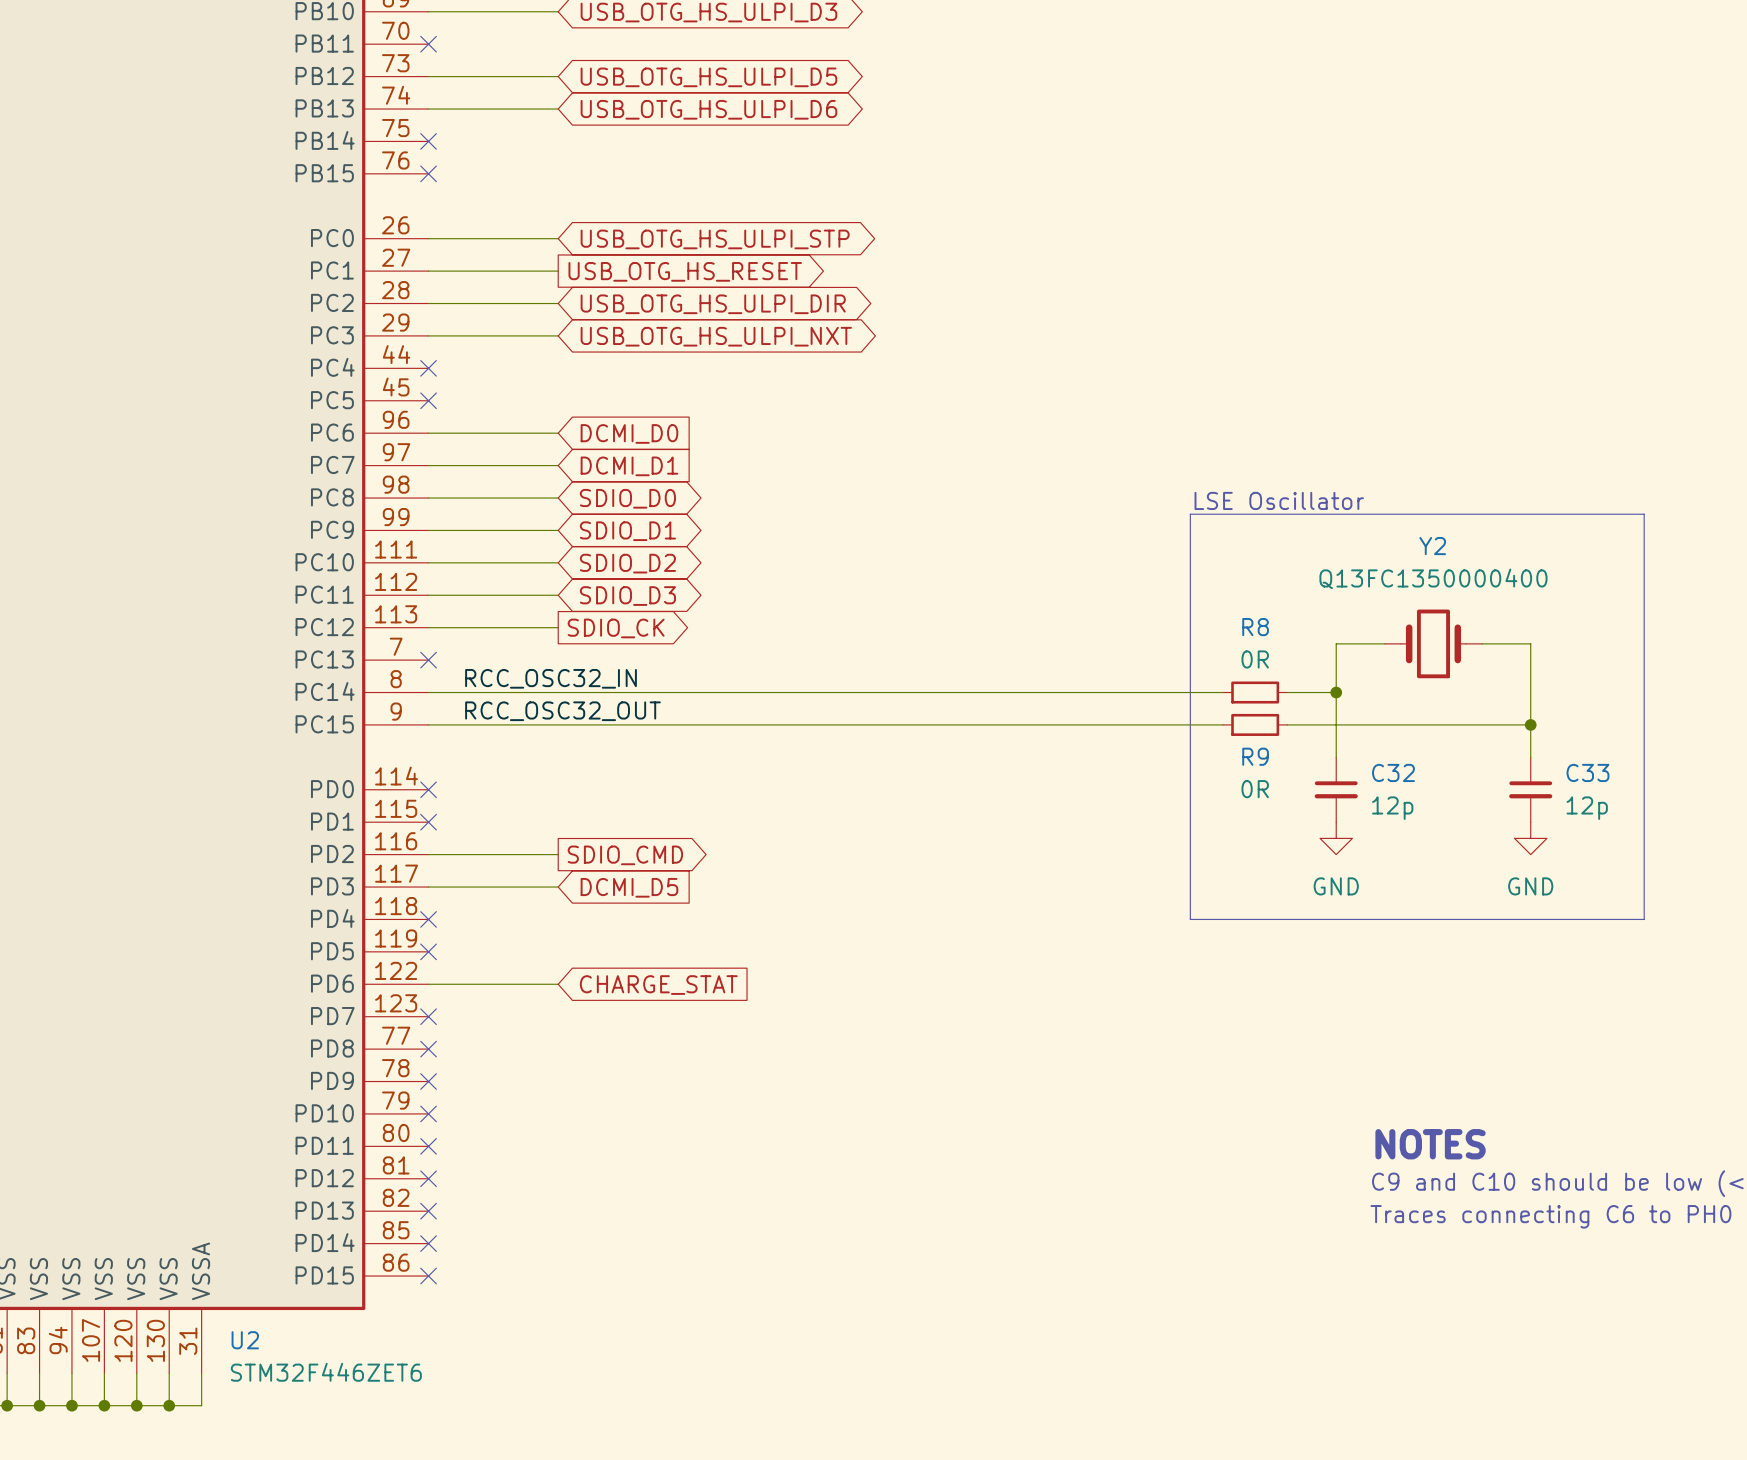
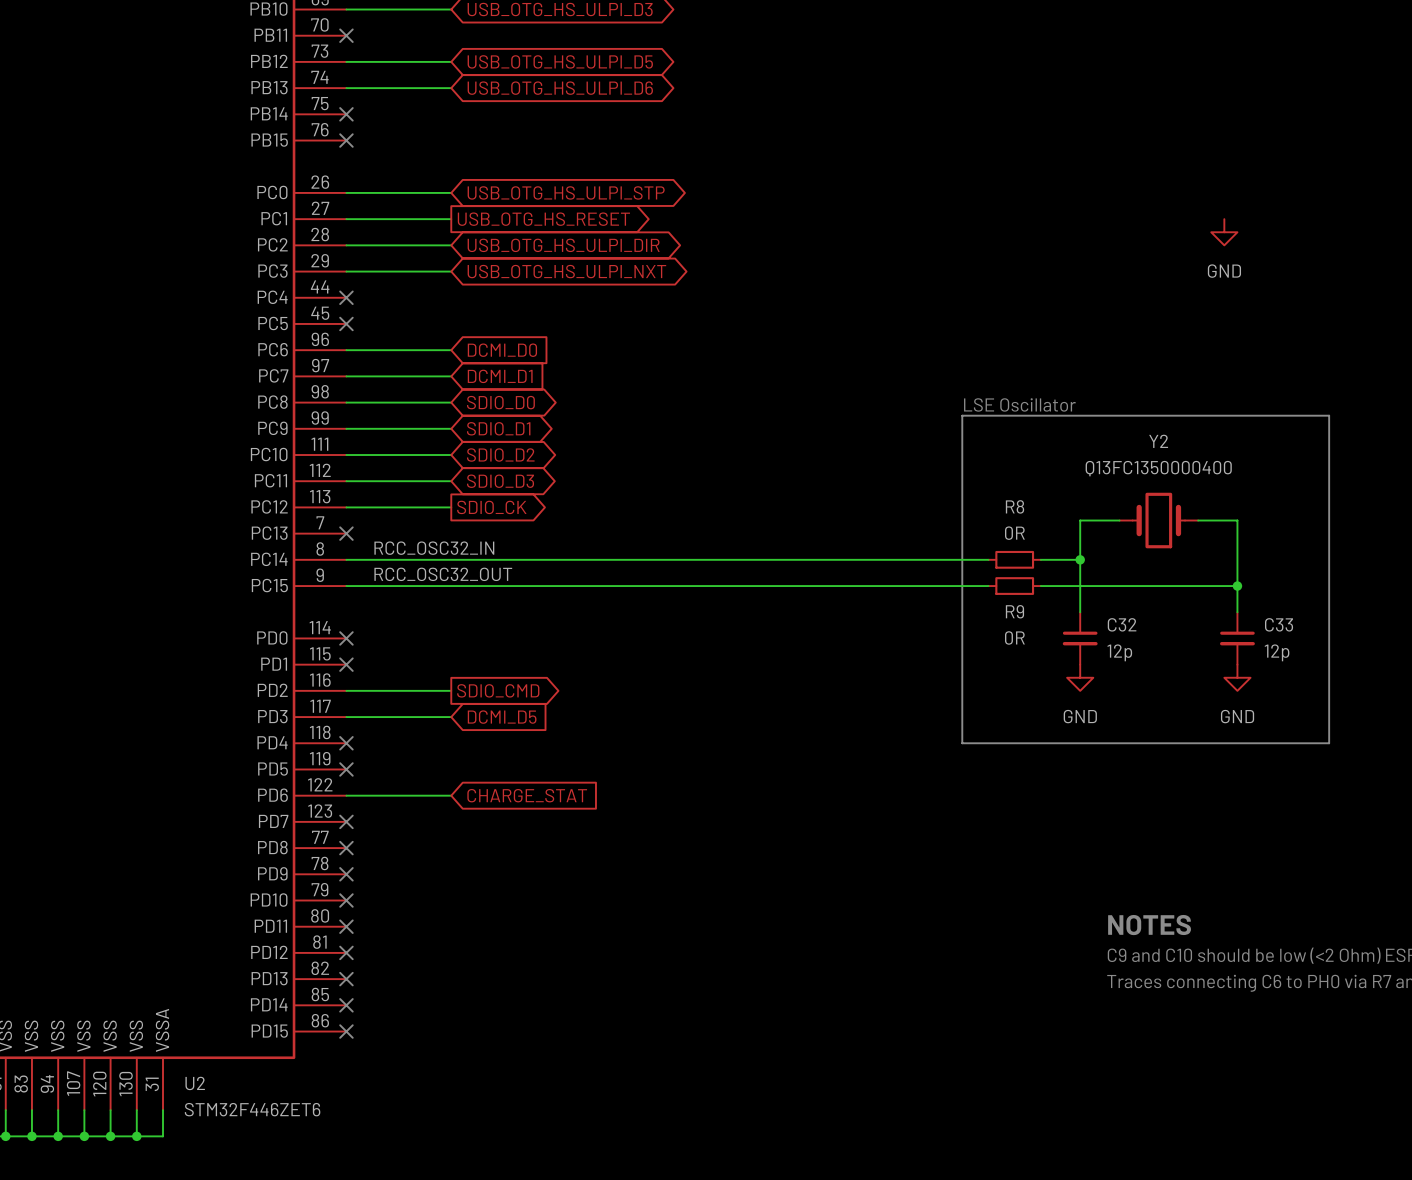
power symbol: none -> GND (1224, 232)

